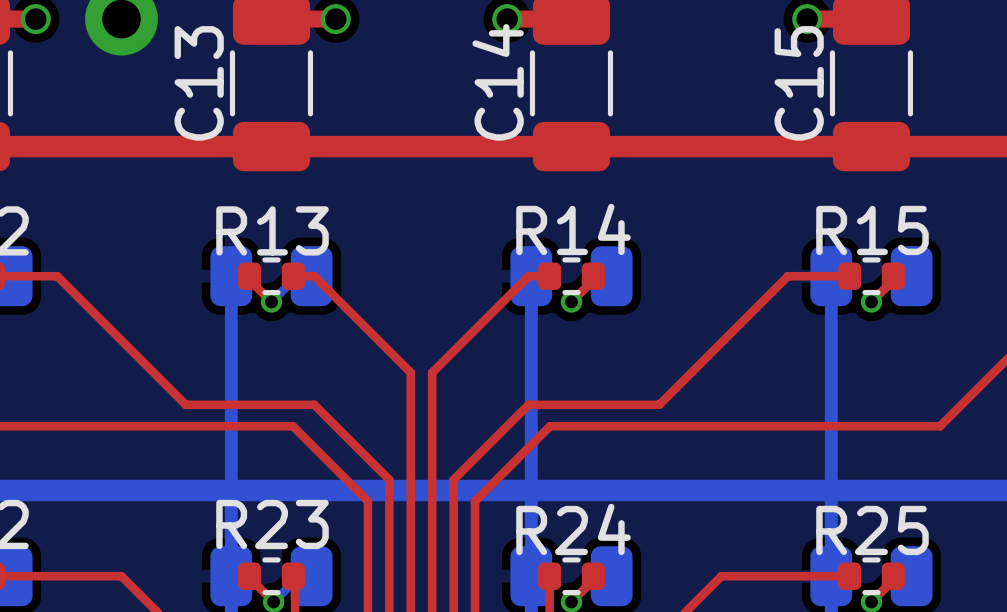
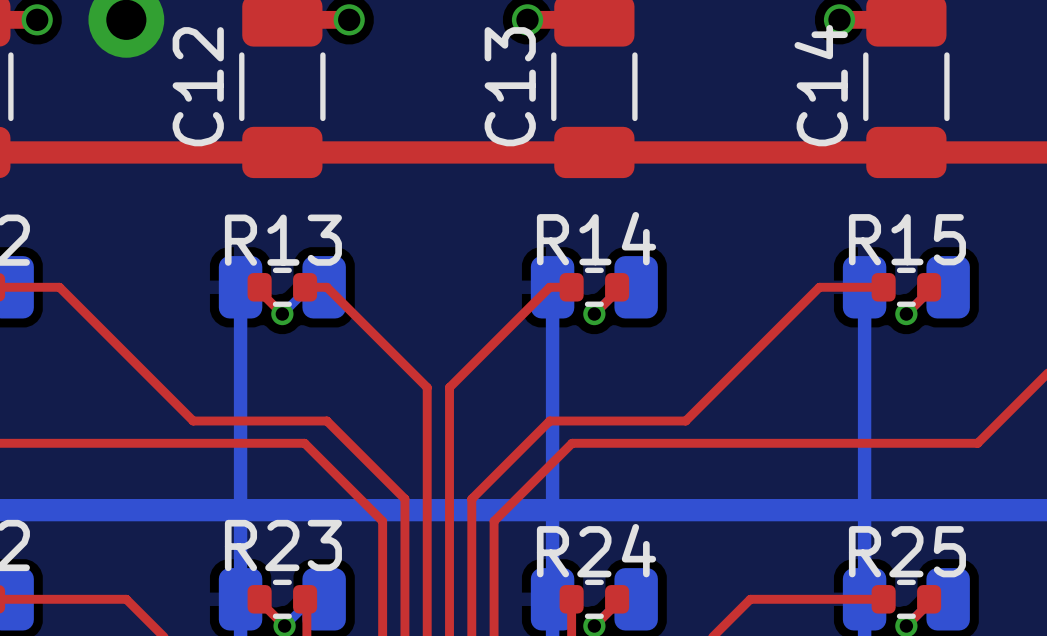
C14 name: C14 (498, 82) -> C13 (510, 86)
C13 name: C13 (199, 83) -> C12 (198, 86)
C15 name: C15 (799, 83) -> C14 (821, 85)

